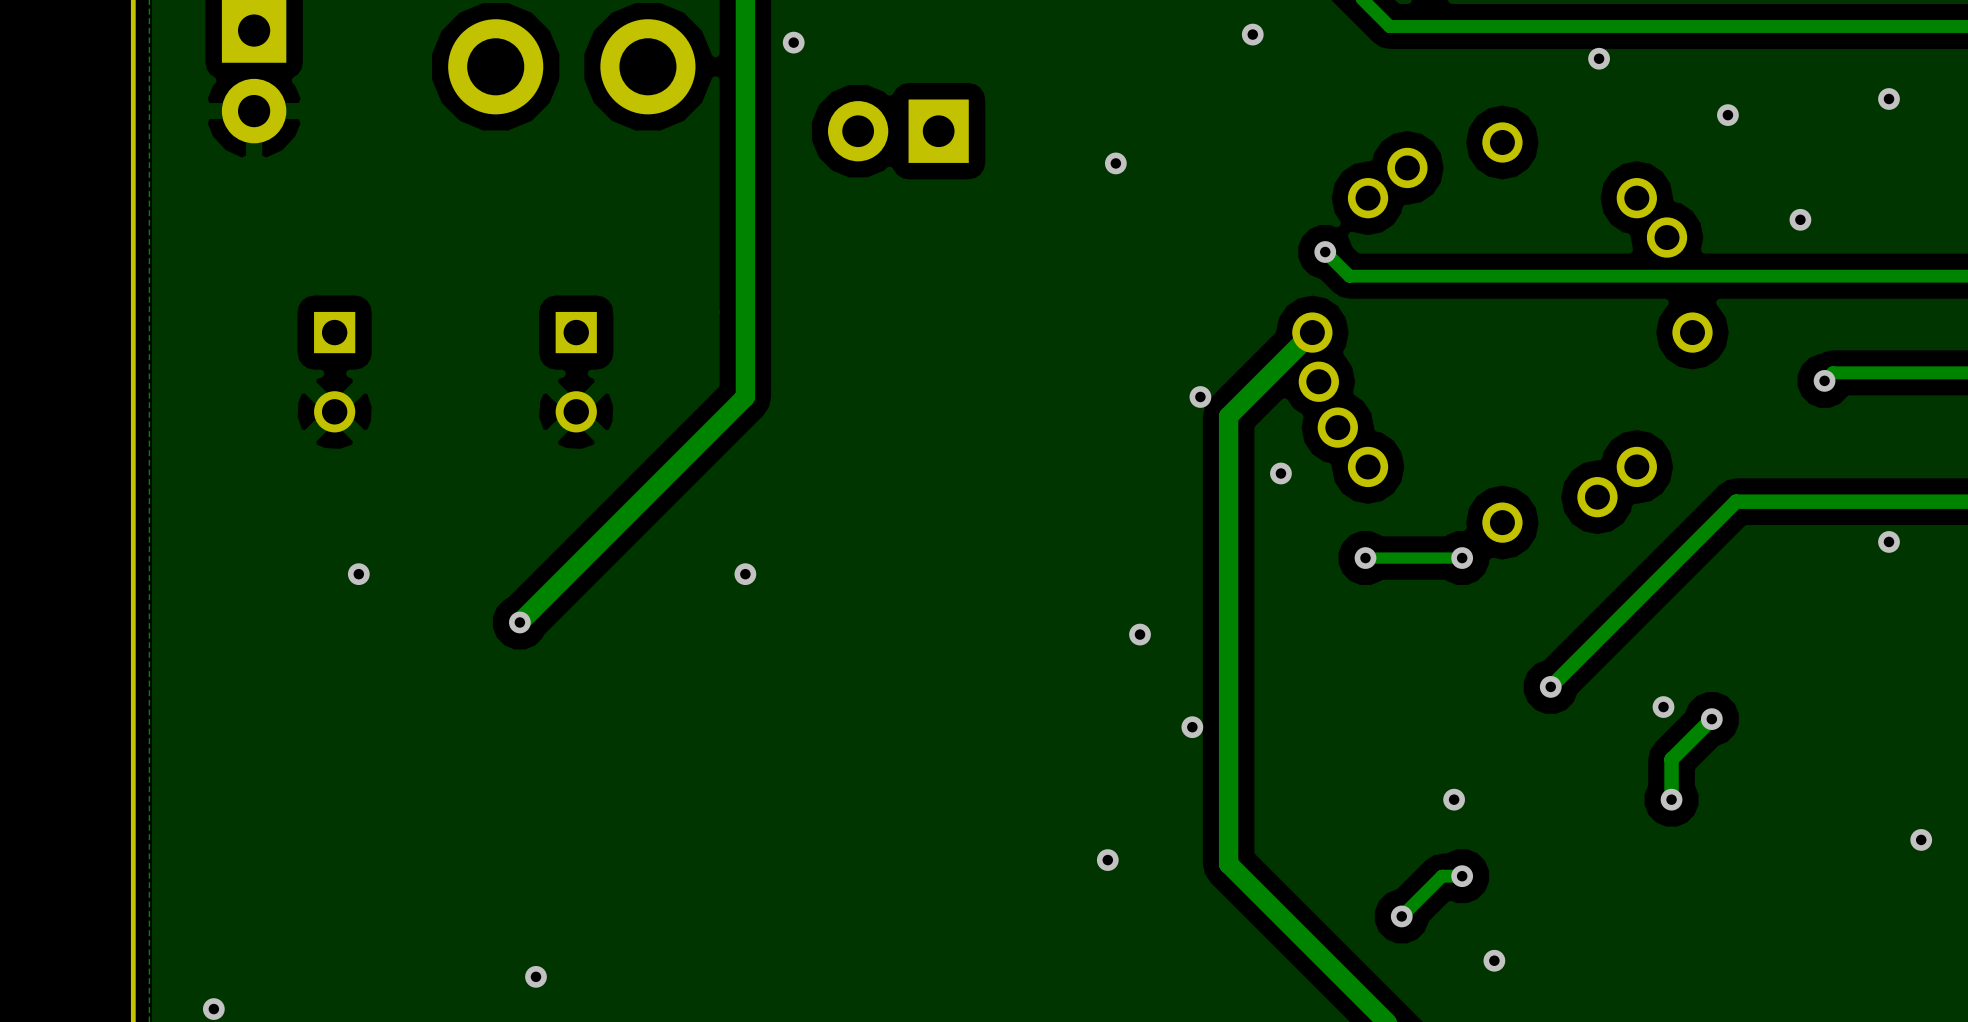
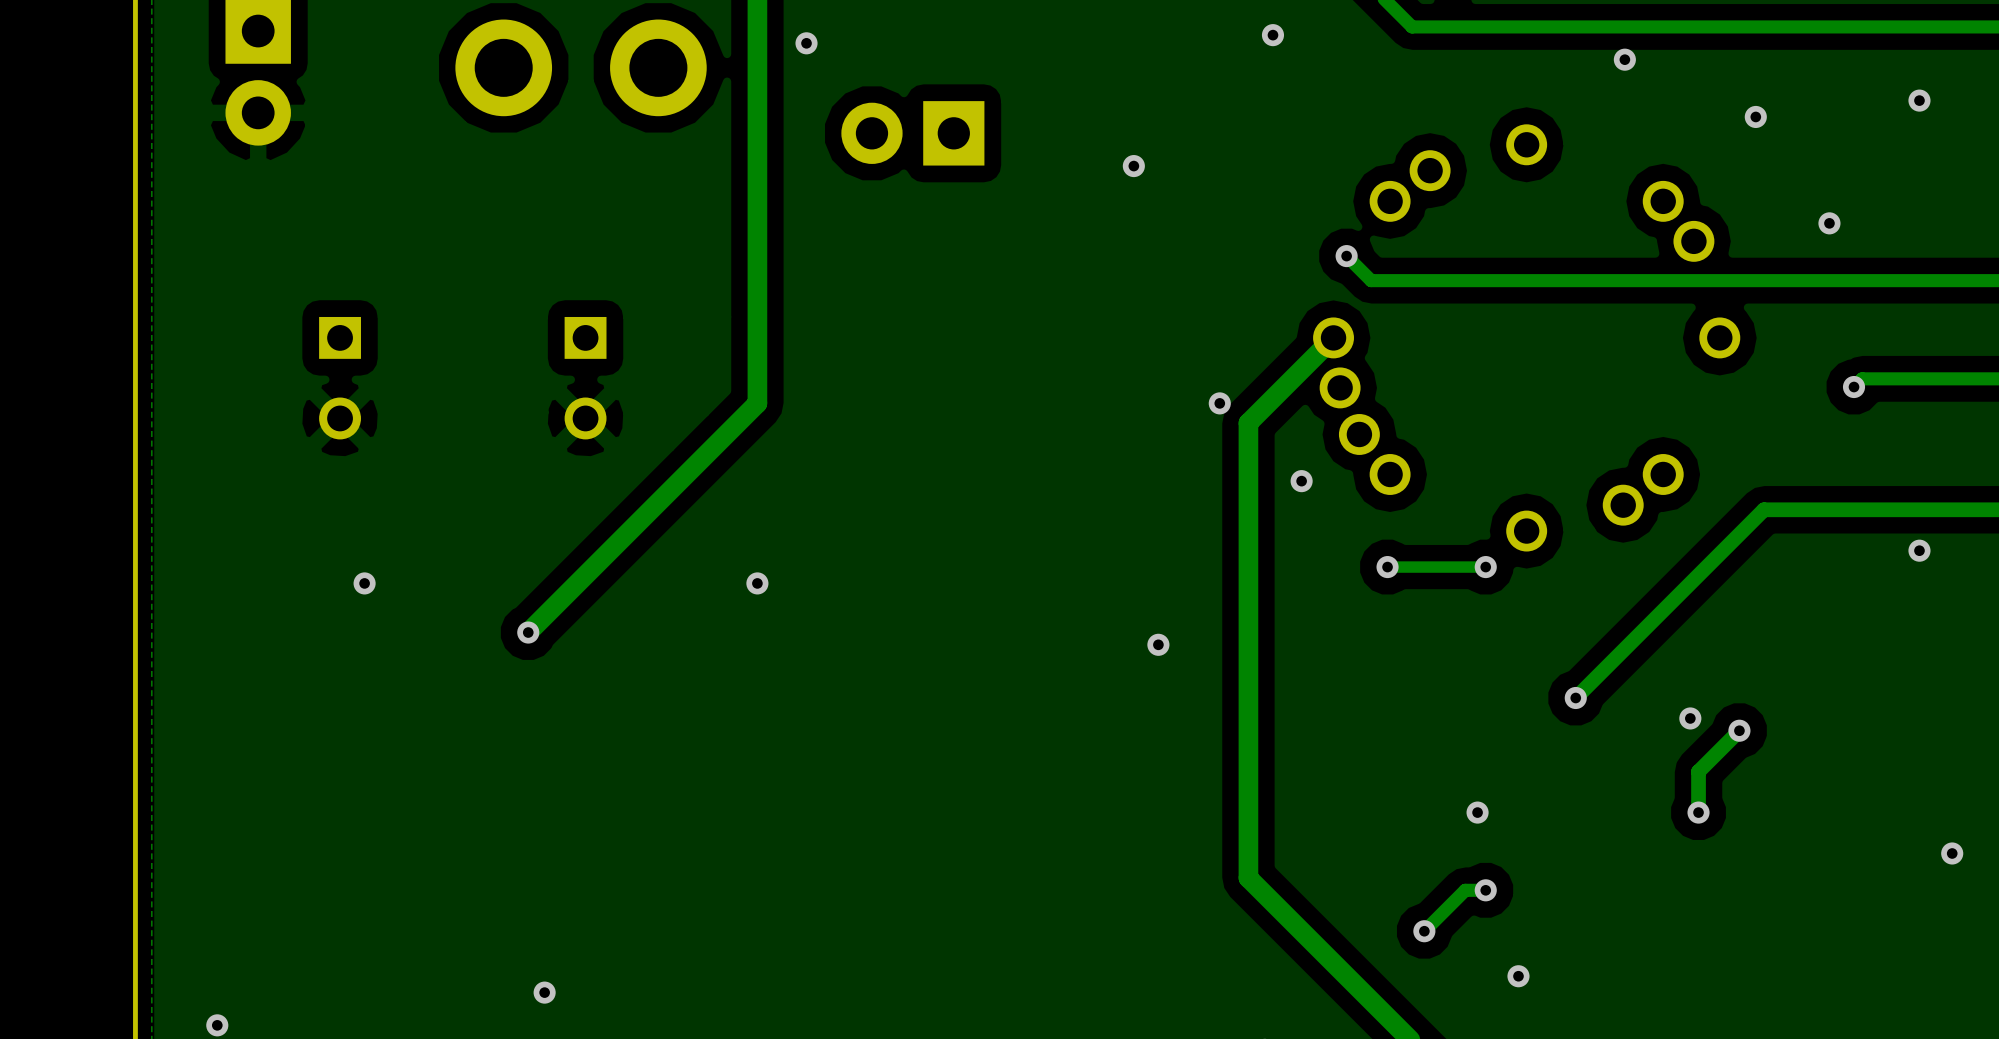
via: (1192, 727) -> none
via: (1107, 860) -> none

